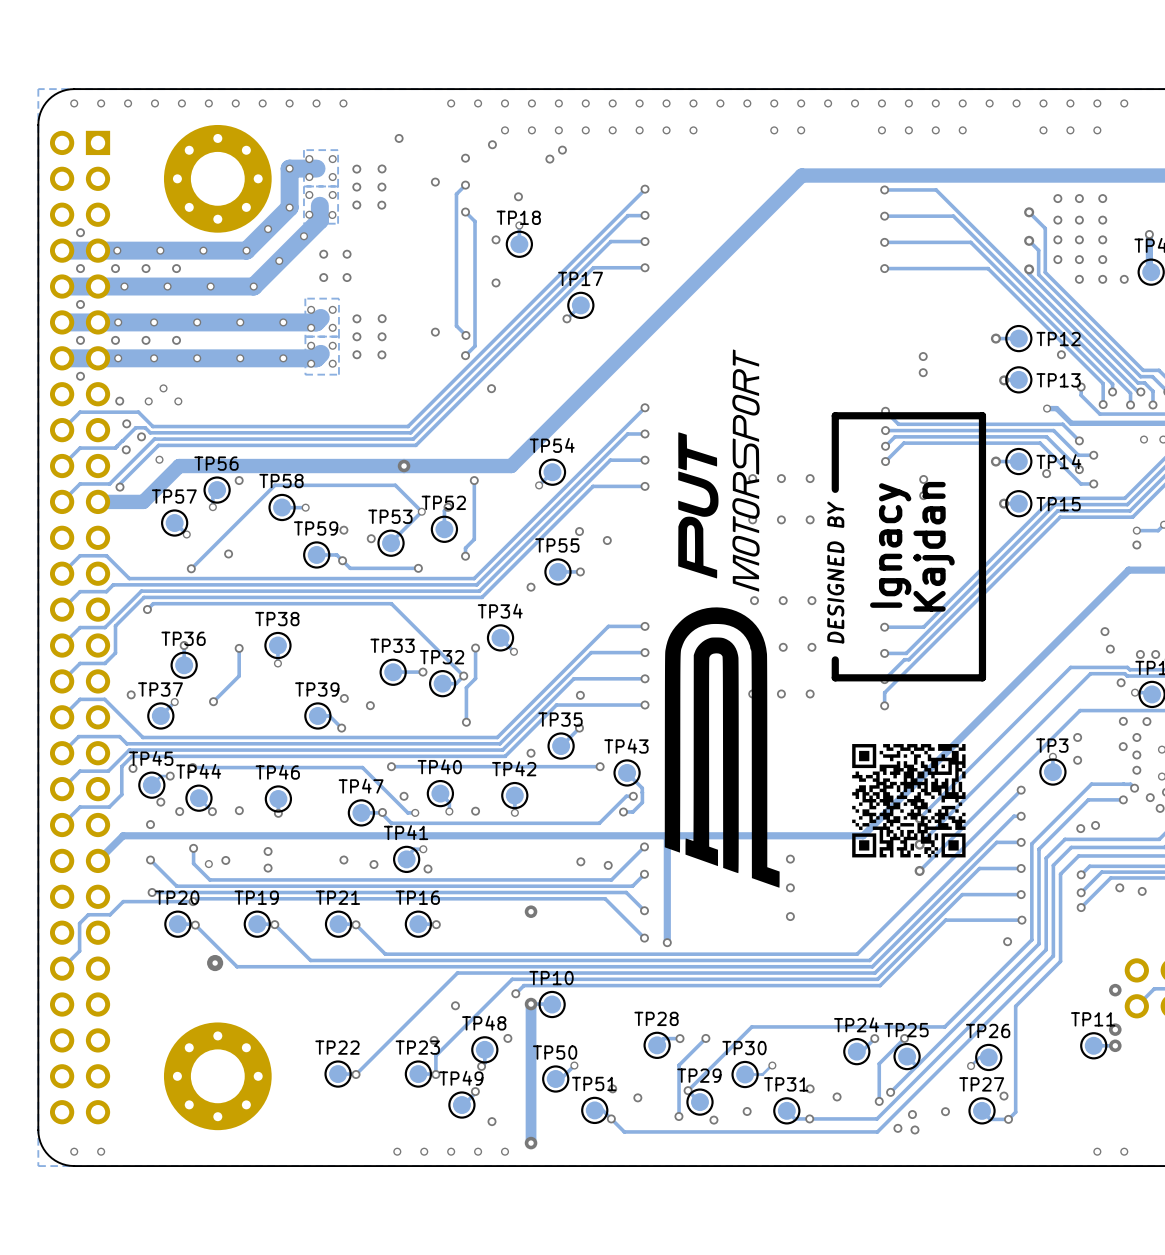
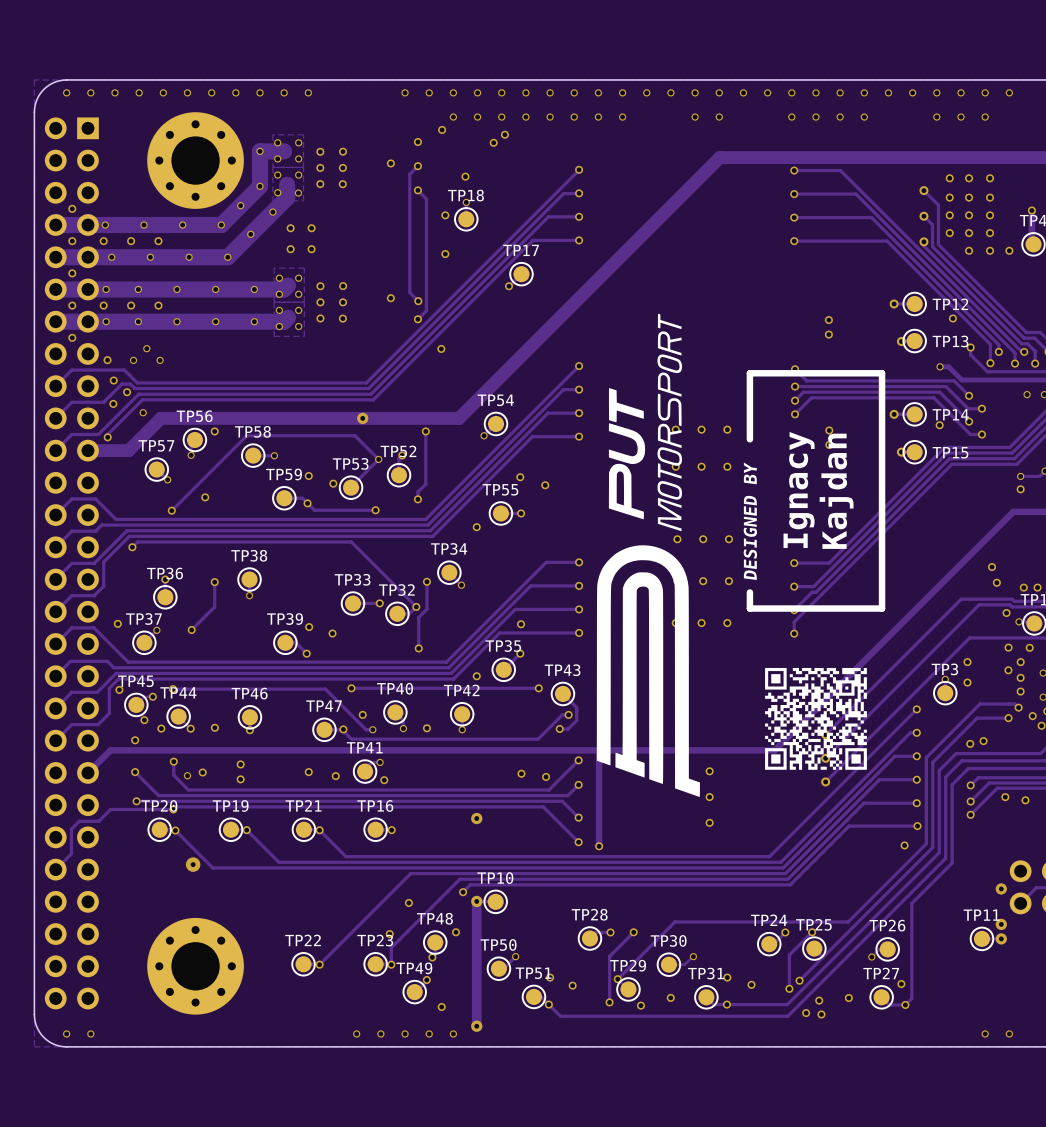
via: (399, 138) -> none

